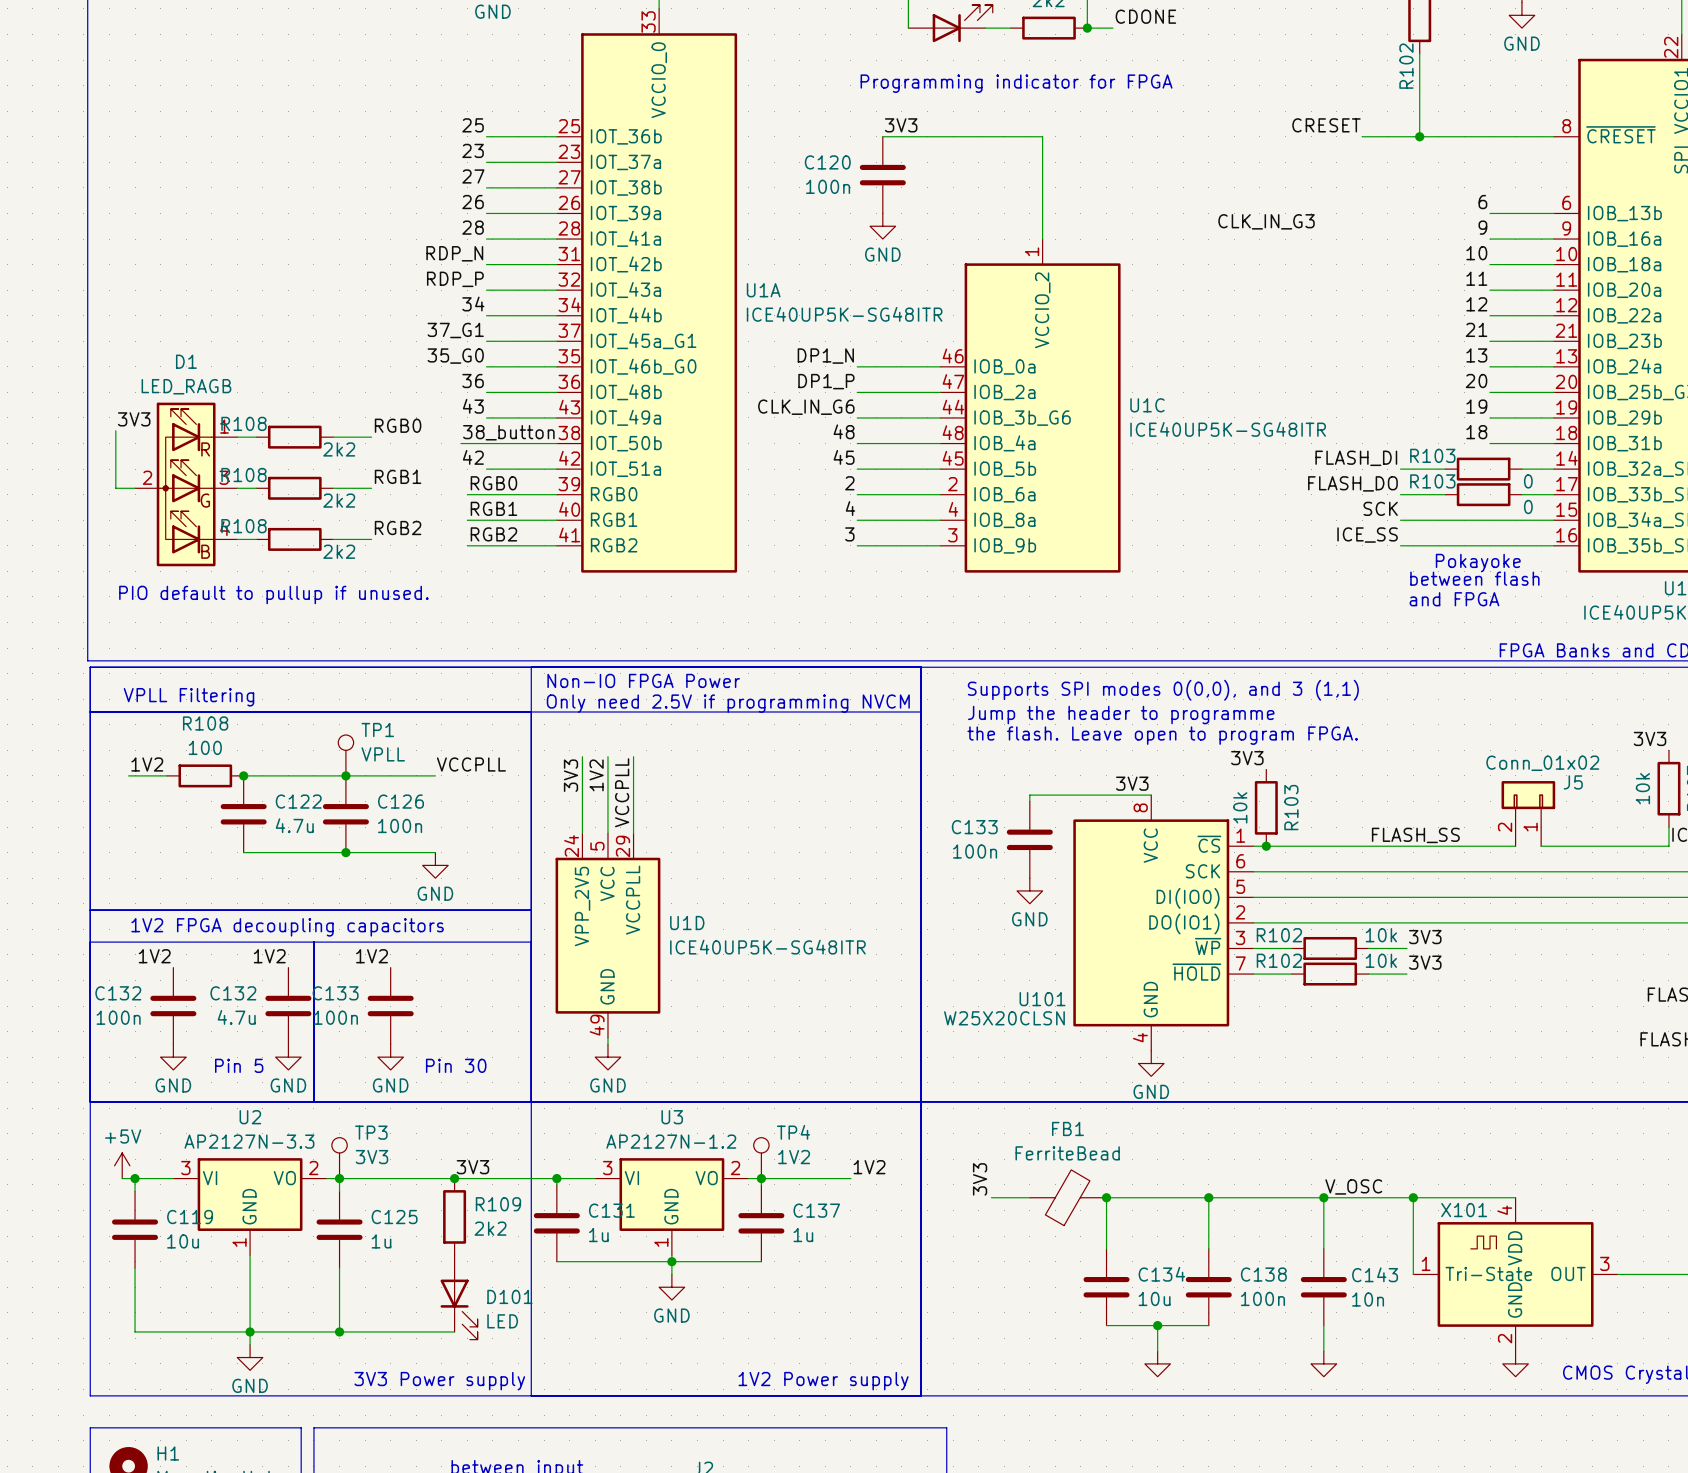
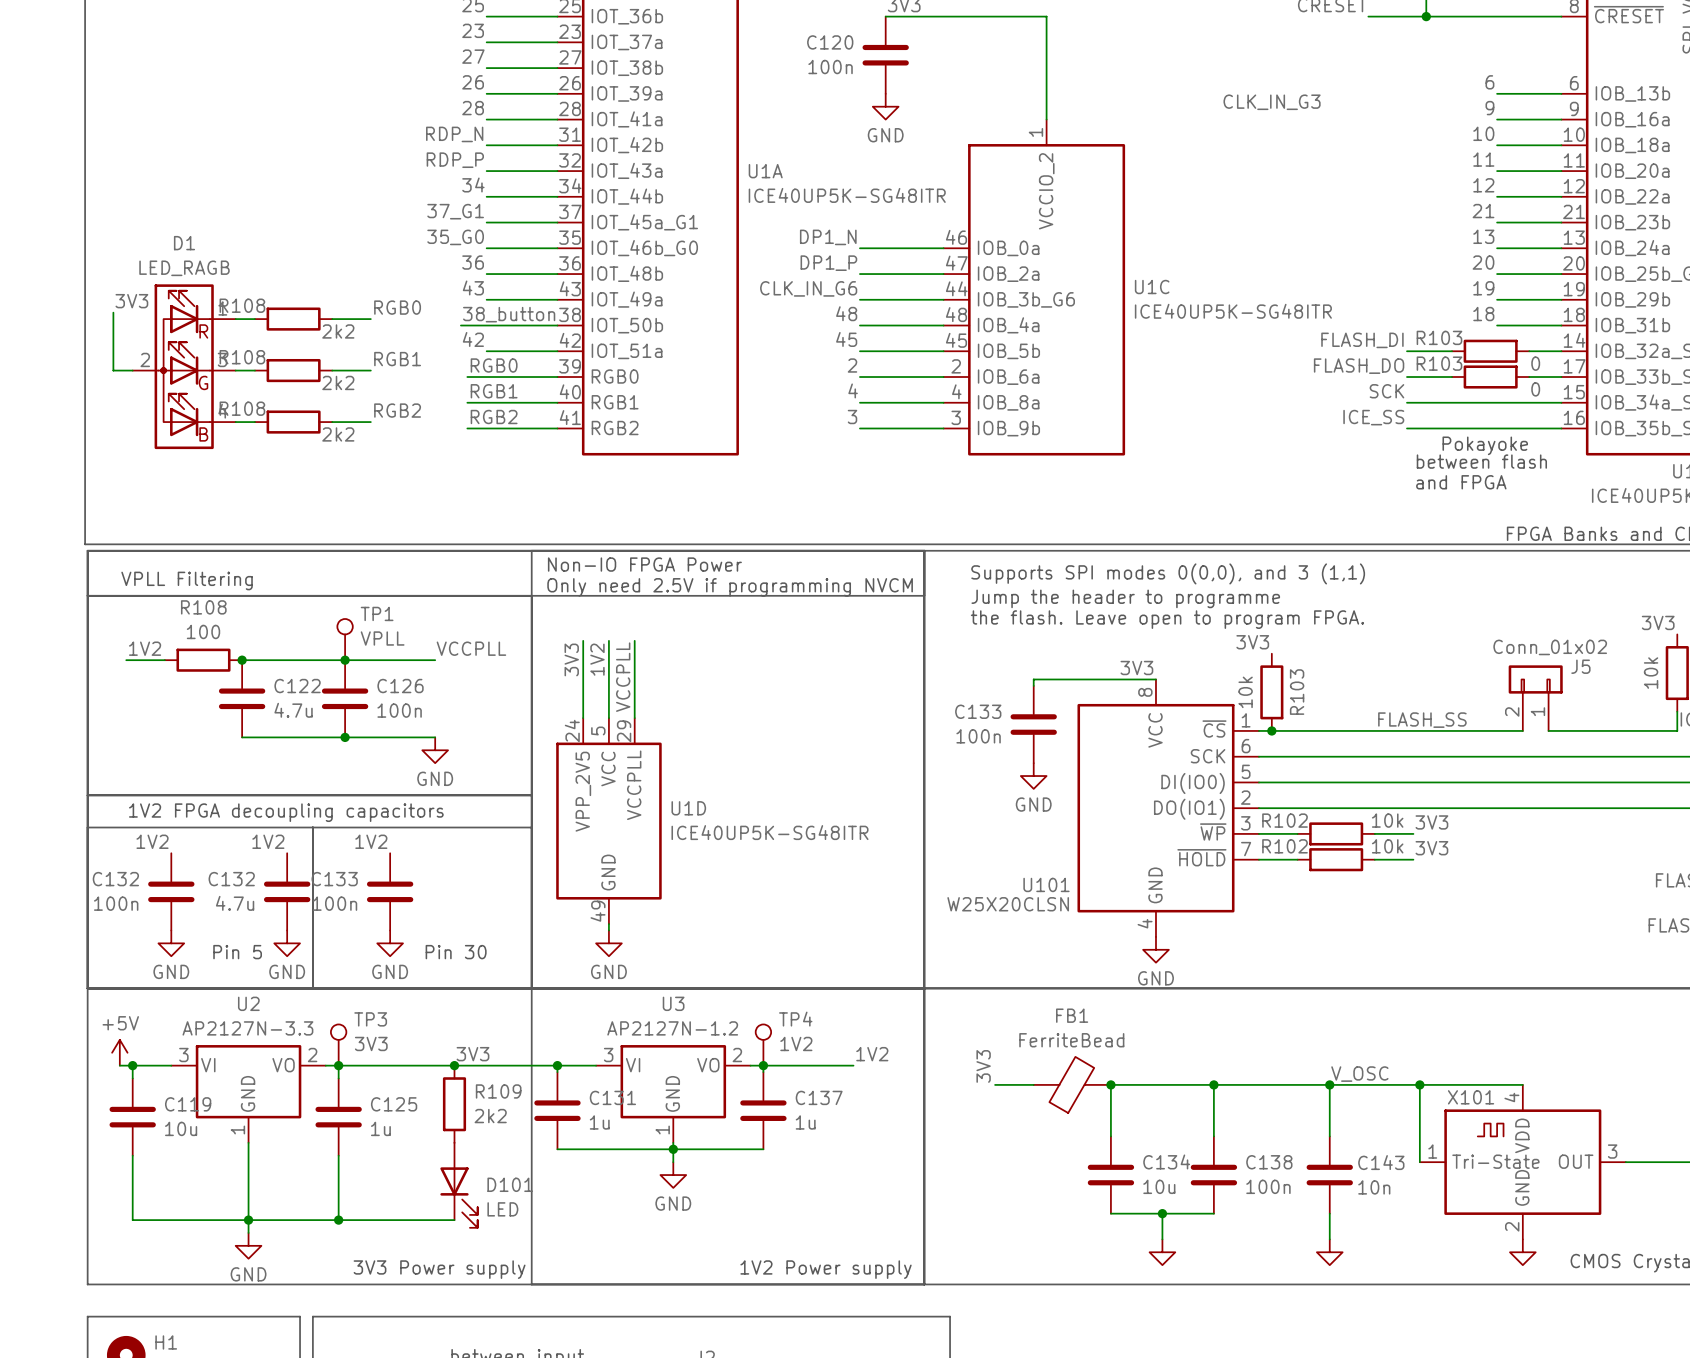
text: PIO default to pullup if unused. (273, 595) -> none

